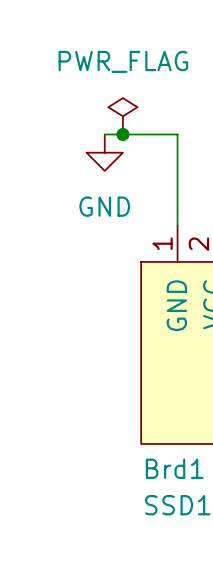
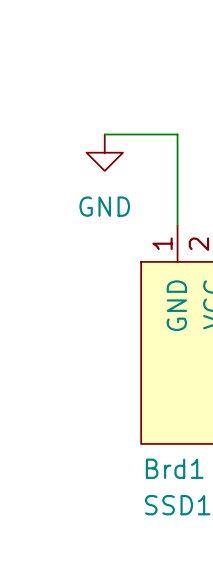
power symbol: PWR_FLAG (122, 116) -> none
junction: (122, 134) -> none

